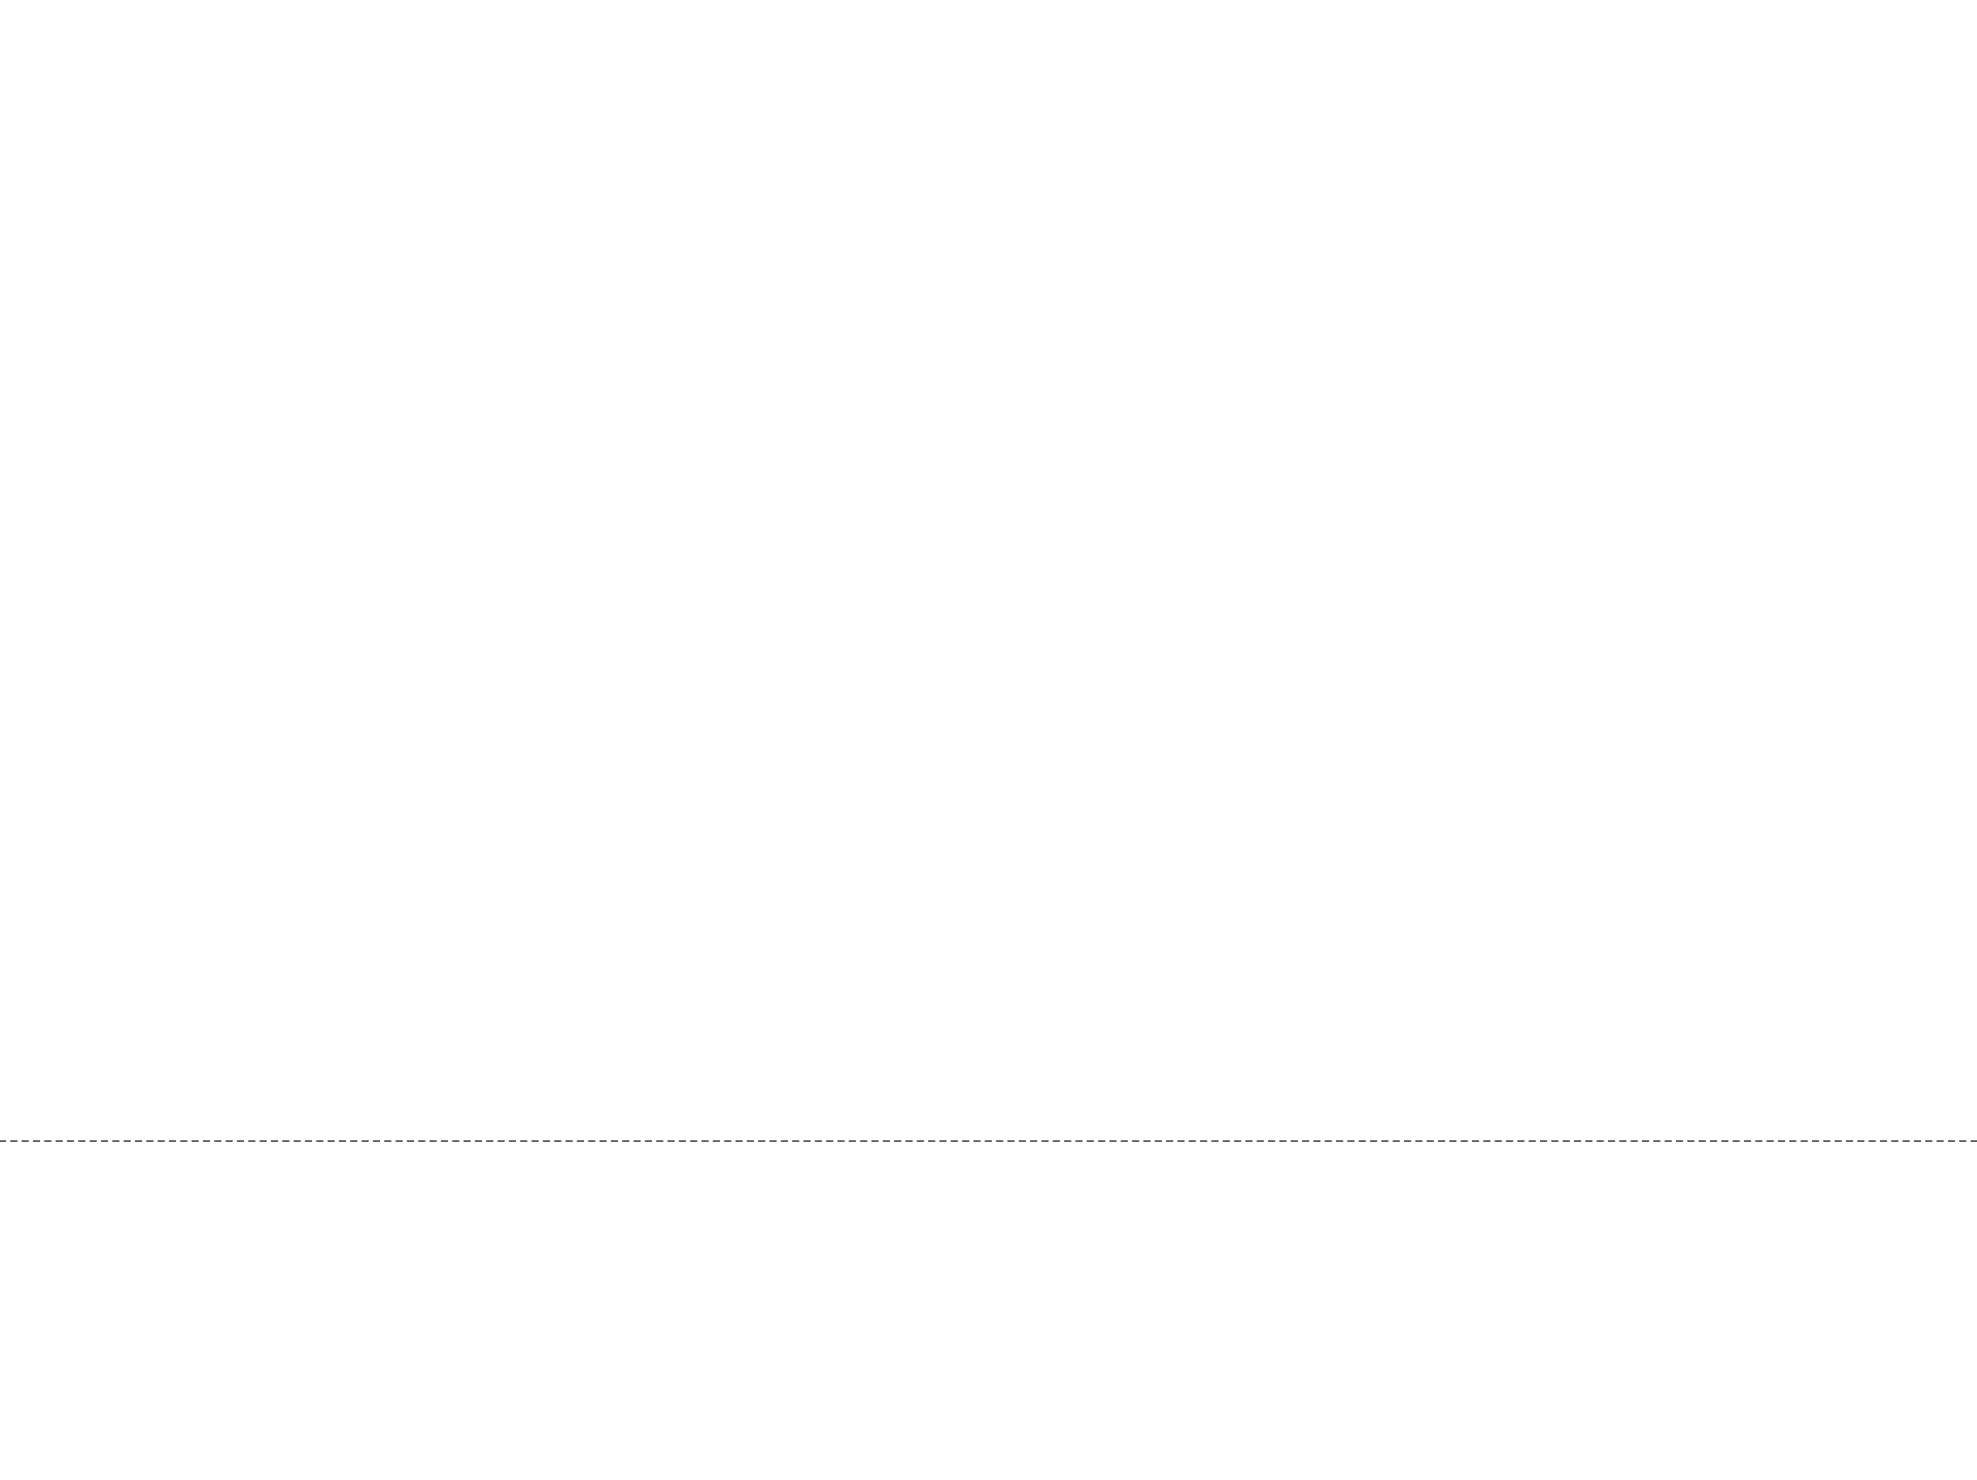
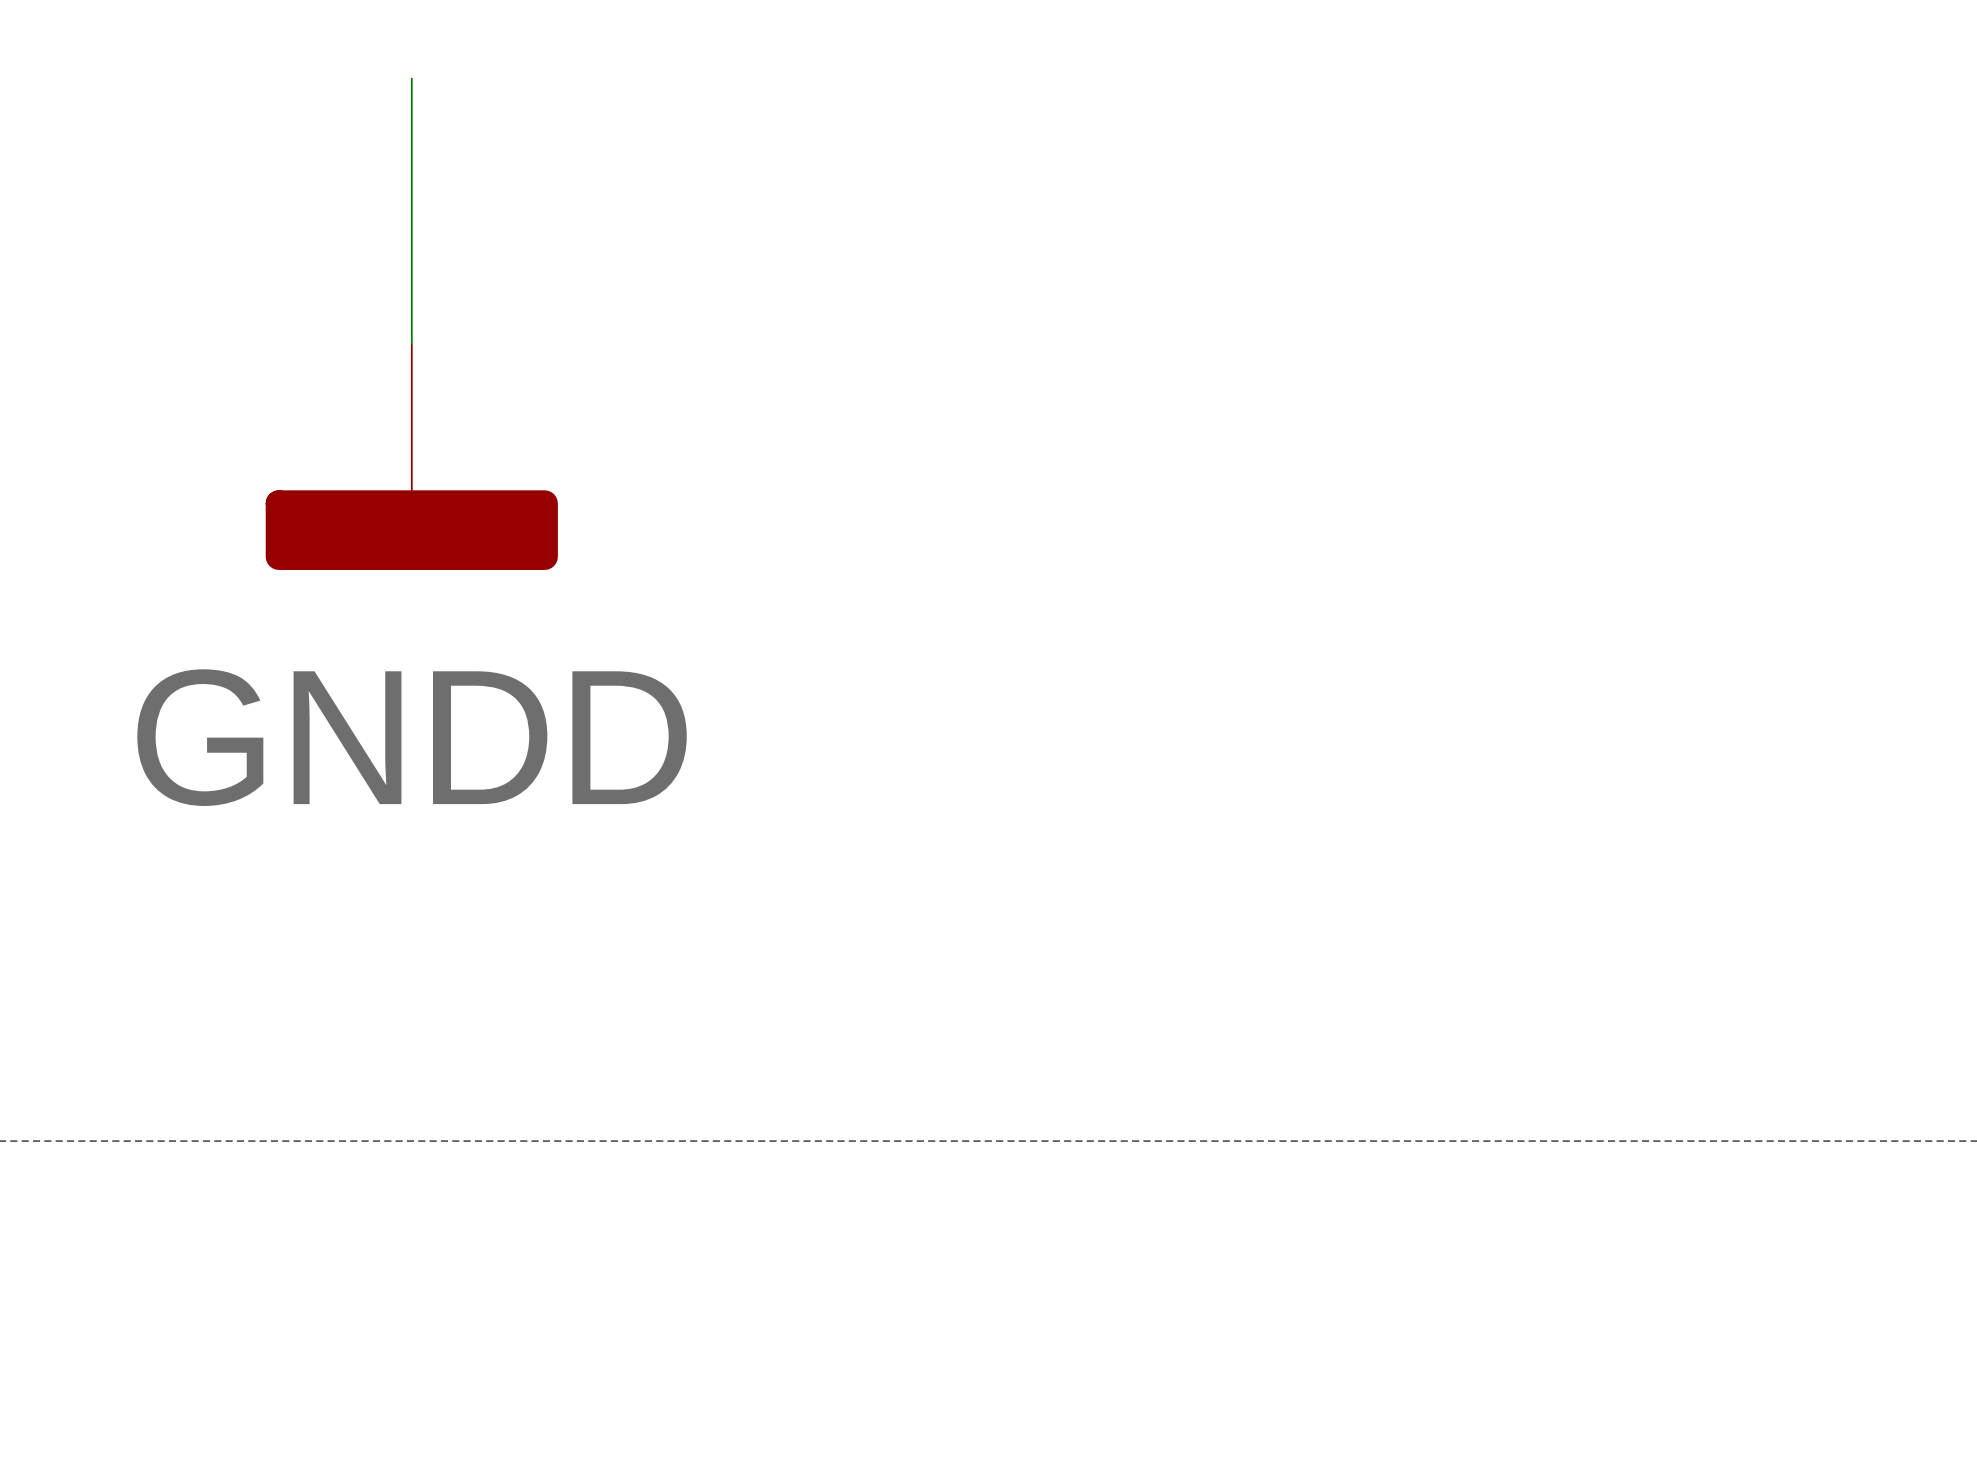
wire: none -> (411, 78) (411, 344)
power symbol: none -> GNDD (411, 457)

